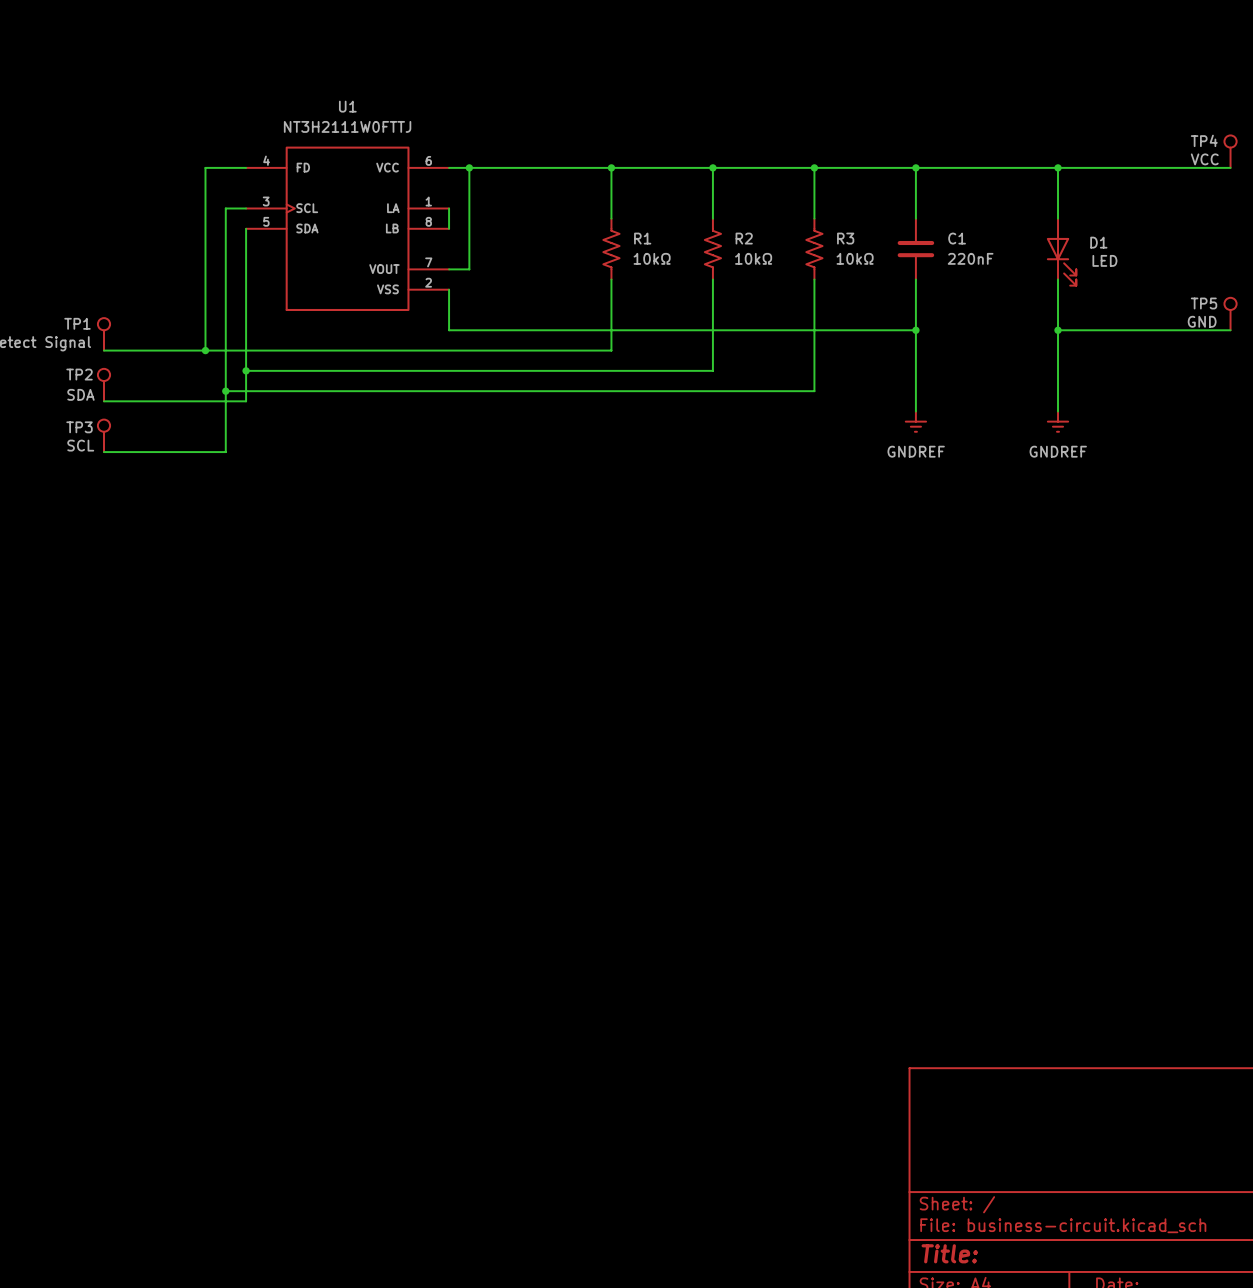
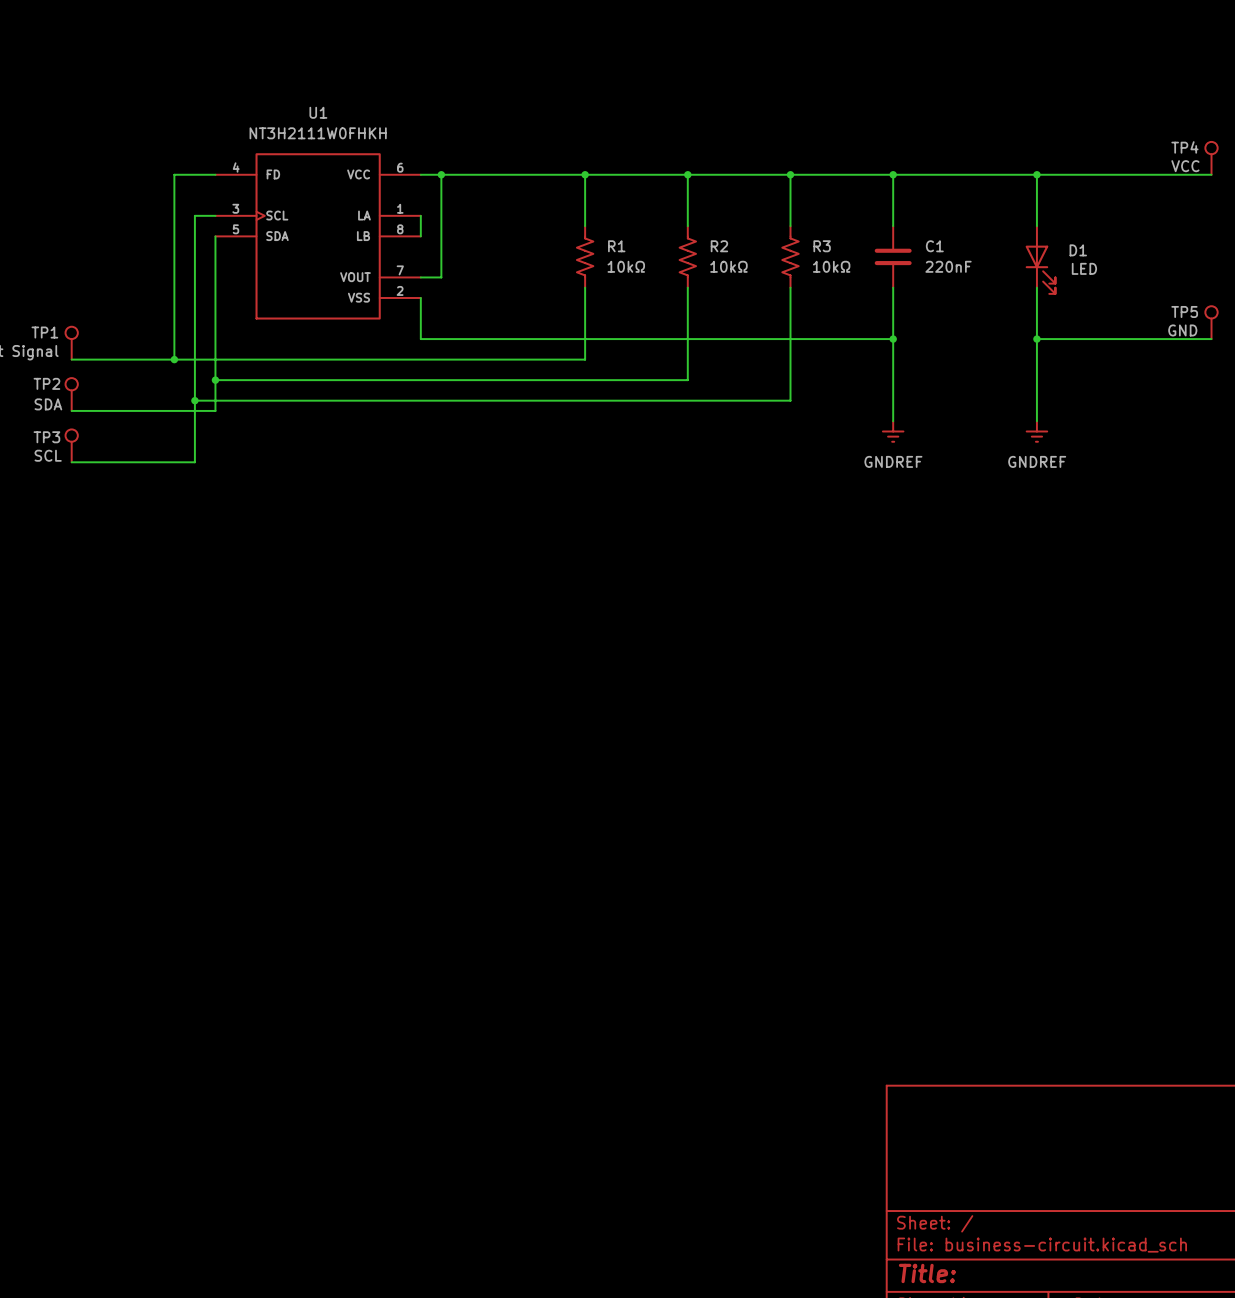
U1 value: NT3H2111W0FTTJ (347, 126) -> NT3H2111W0FHKH (318, 133)

